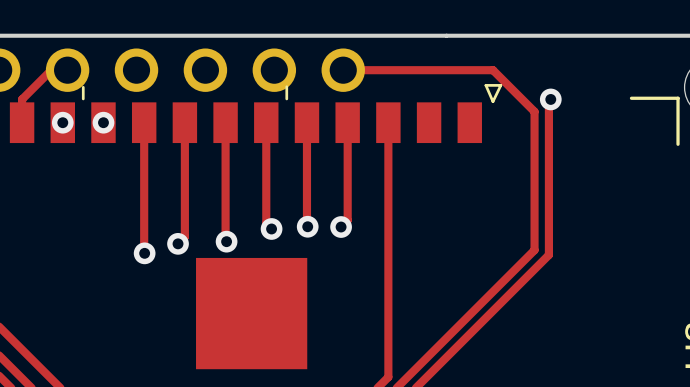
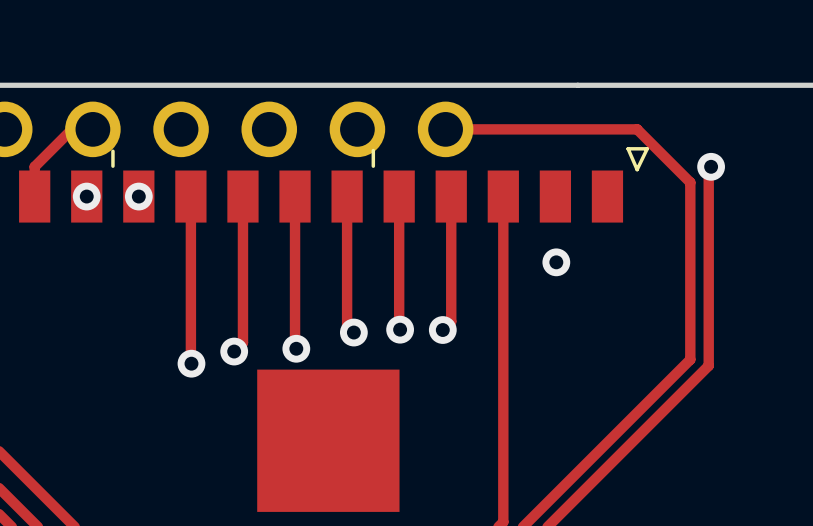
via: none -> (556, 262)

